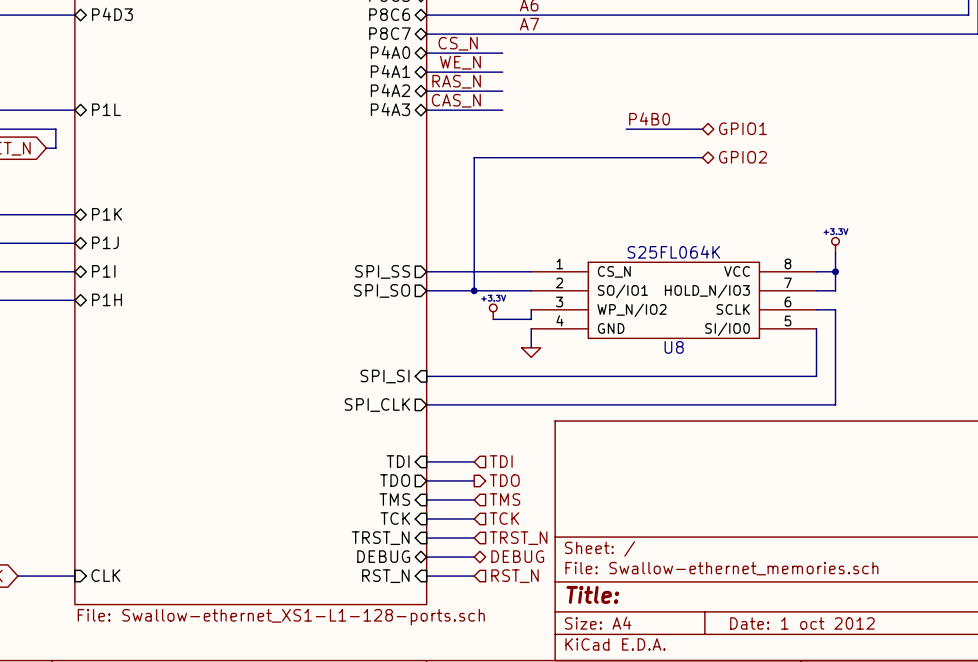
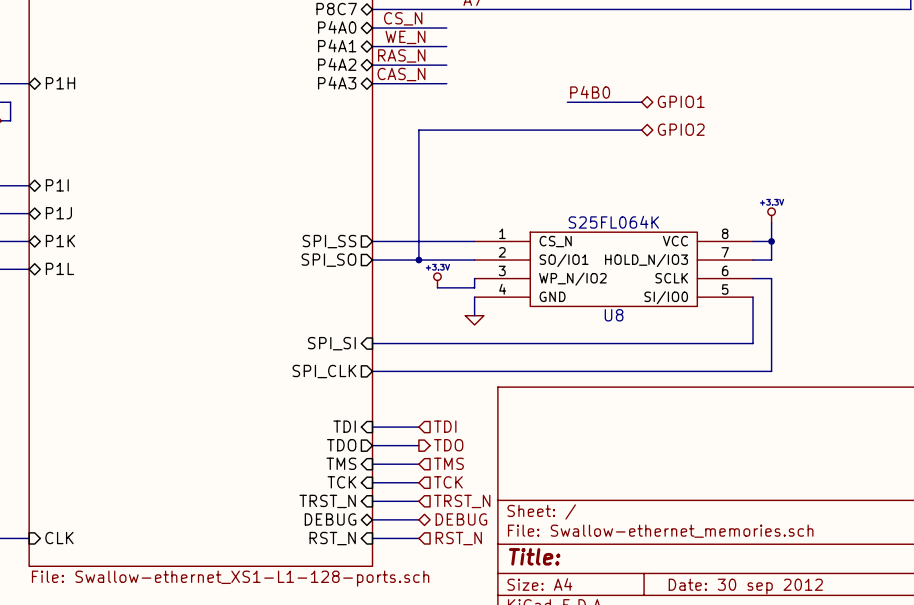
sheet pin: P1L (106, 109) -> P1H (60, 83)
sheet pin: P1K (107, 214) -> P1I (57, 185)
sheet pin: P1I (103, 271) -> P1K (60, 241)
sheet pin: P1H (107, 299) -> P1L (59, 268)
title block: Date: 1 oct 2012 (802, 623) -> Date: 30 sep 2012 (745, 586)

